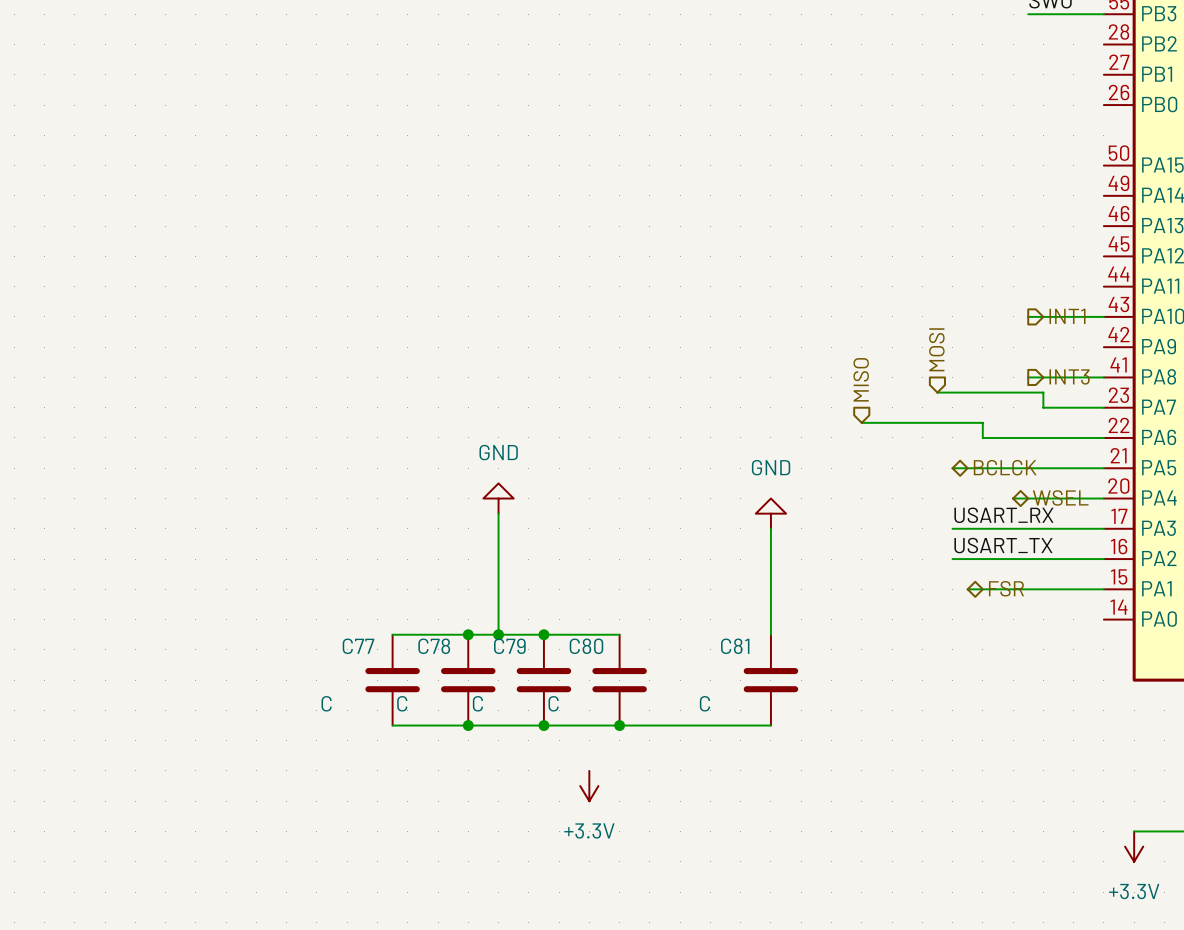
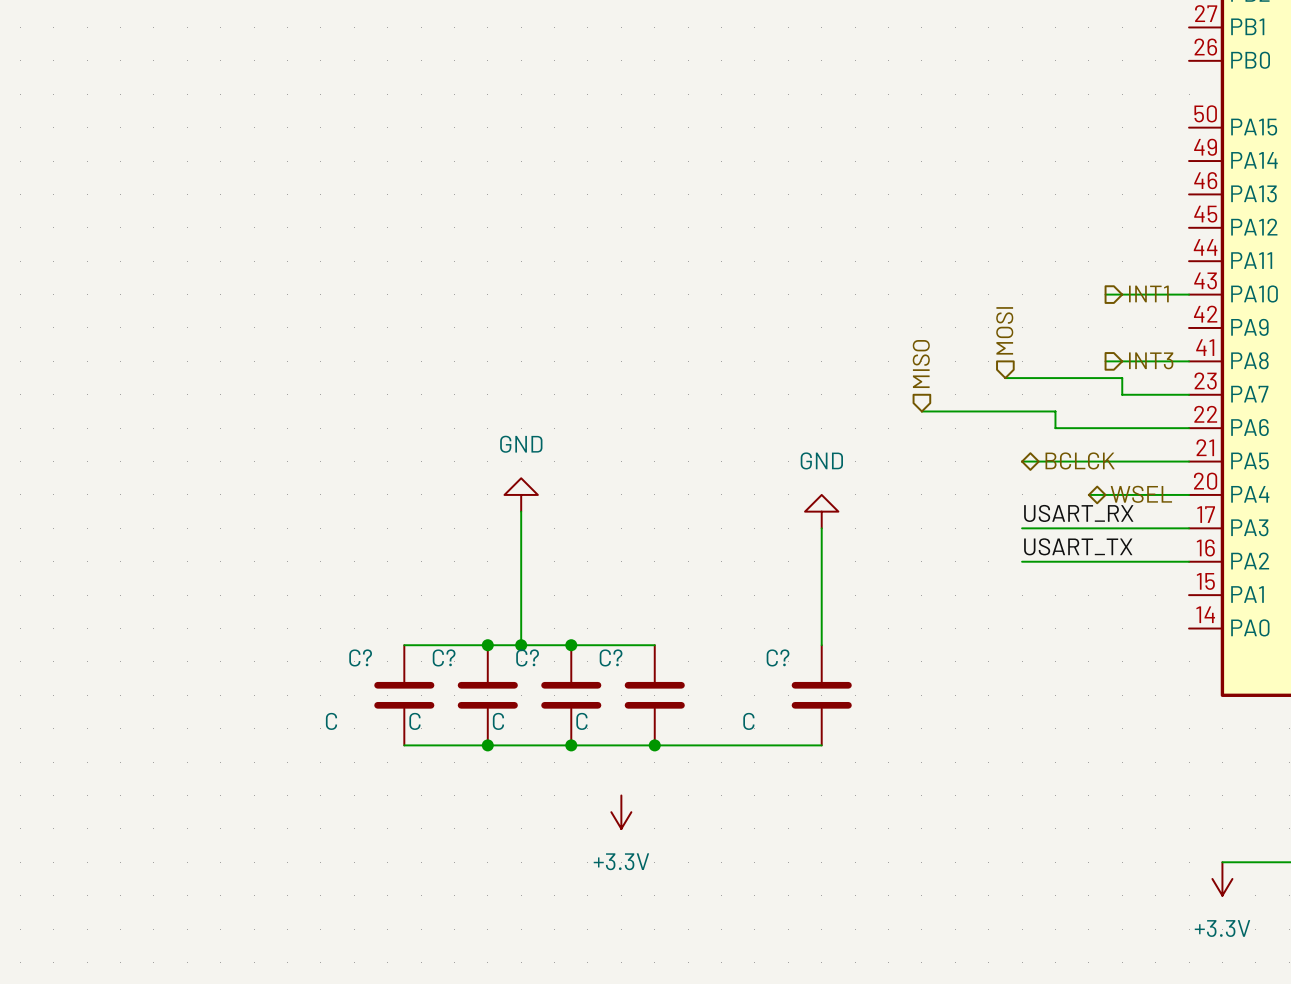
hierarchical label: FSR (1006, 588) -> none
wire: (967, 589) (1103, 589) -> none
C77 name: C77 (358, 646) -> C? (360, 657)
C78 name: C78 (434, 646) -> C? (444, 657)
C79 name: C79 (509, 646) -> C? (527, 657)
C80 name: C80 (586, 646) -> C? (611, 657)
C81 name: C81 (735, 646) -> C? (778, 657)

